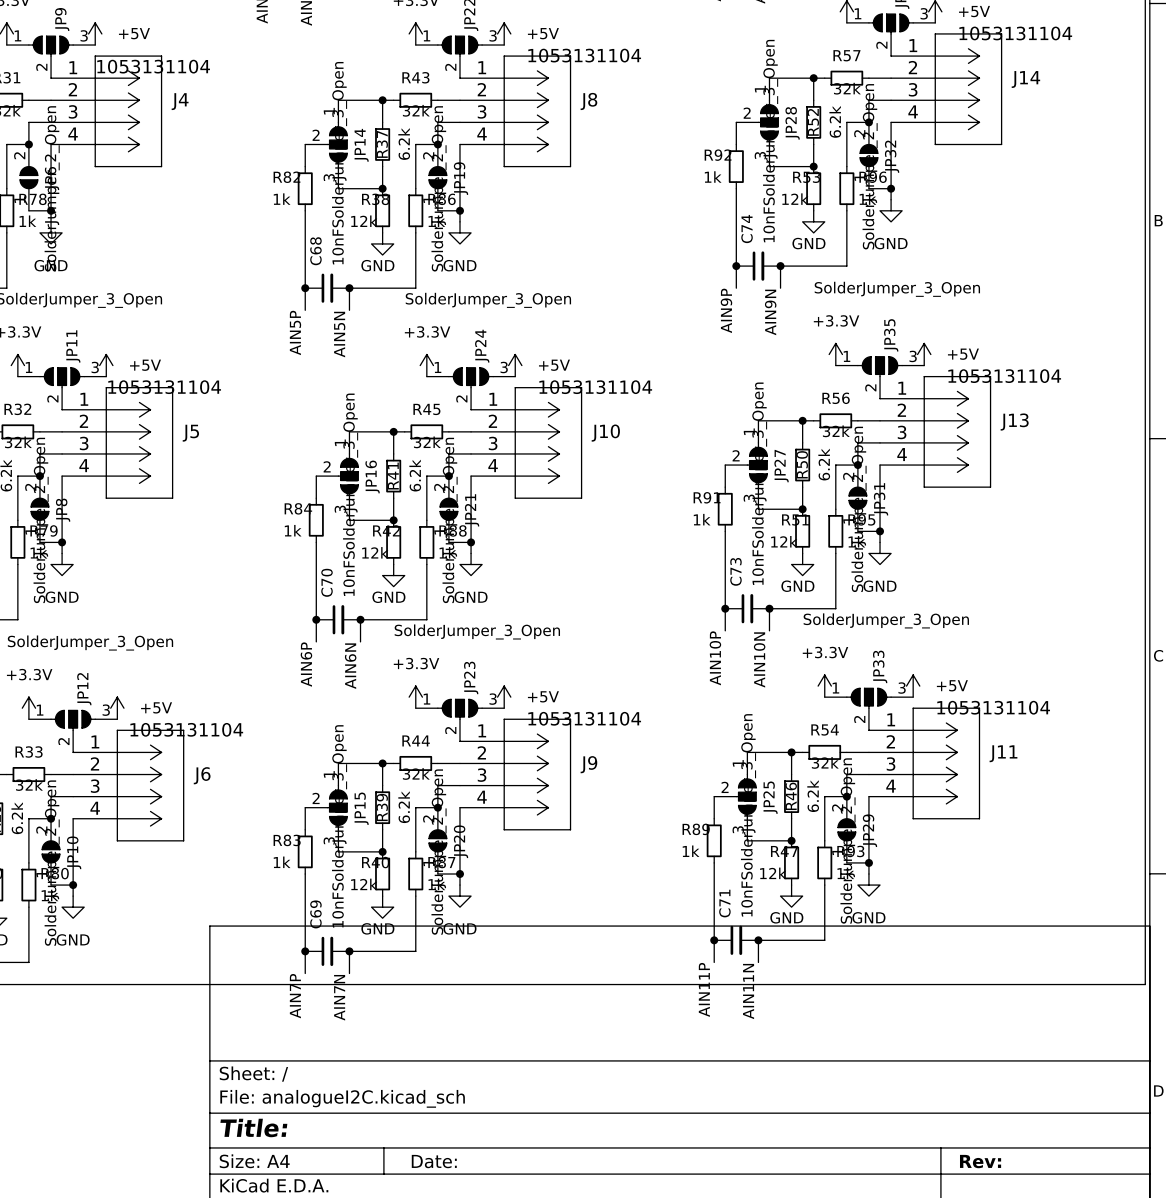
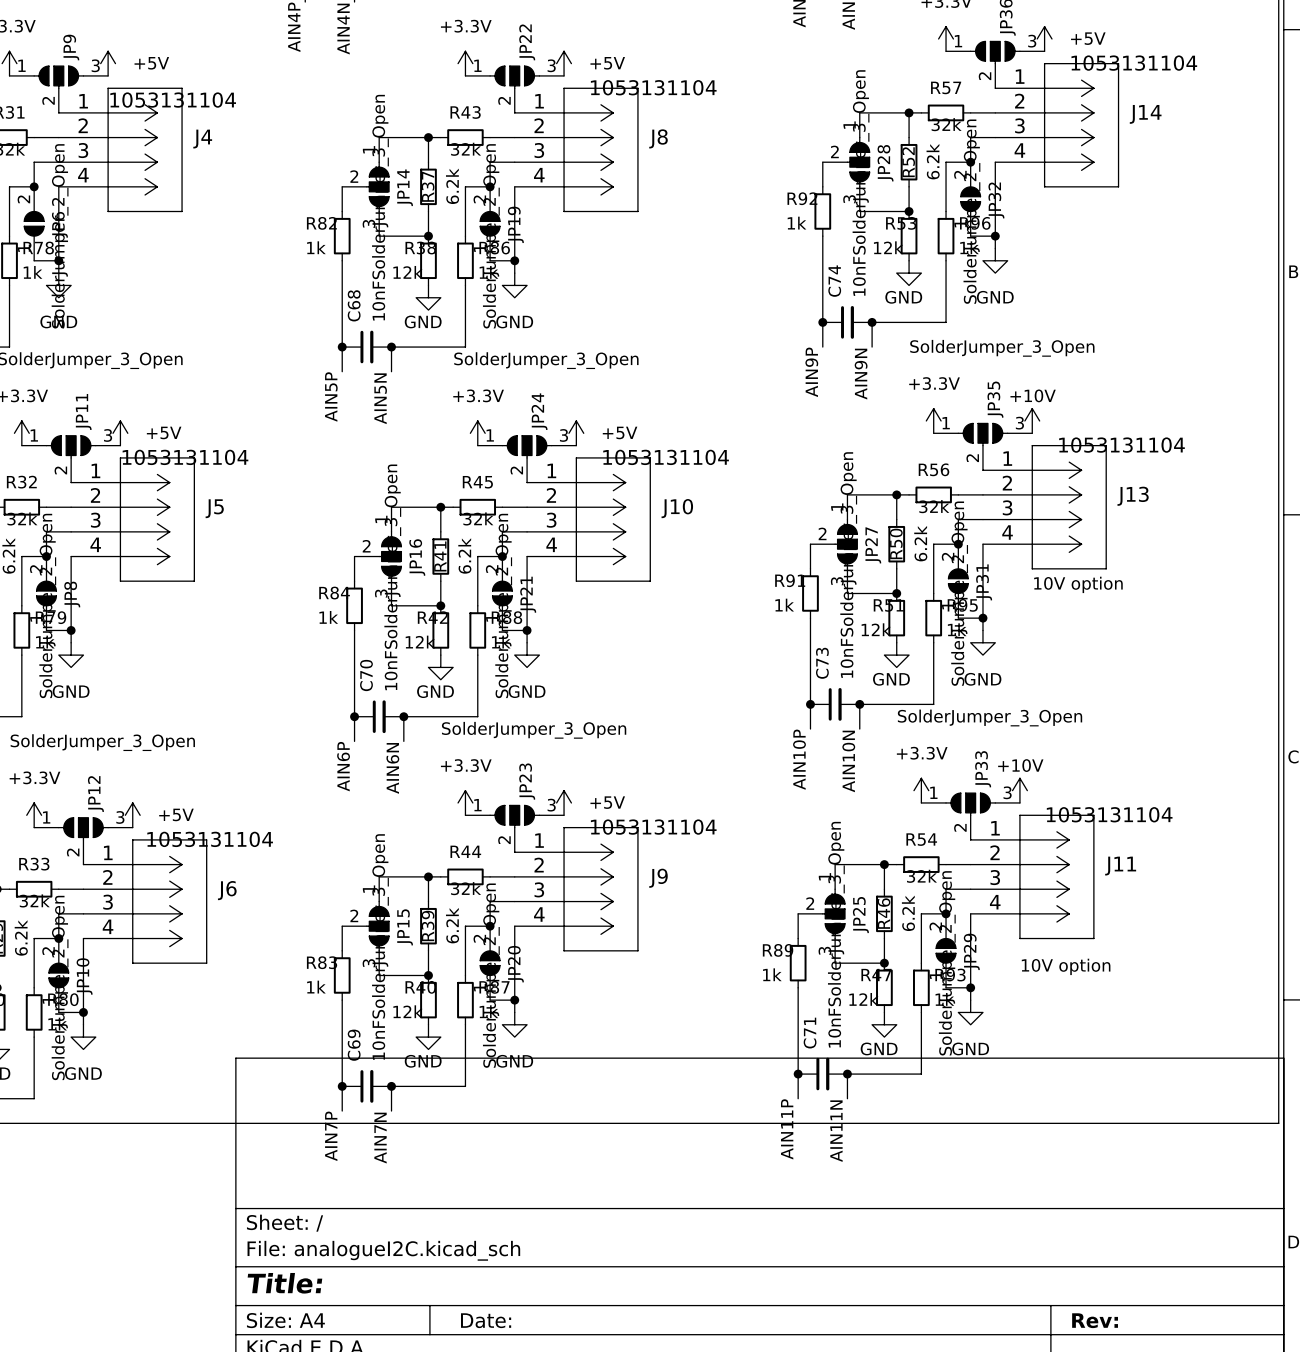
power symbol: +5V (924, 354) -> +10V (1032, 420)
text: none -> 10V option (1078, 584)
power symbol: +5V (913, 686) -> +10V (1019, 790)
text: none -> 10V option (1066, 966)

